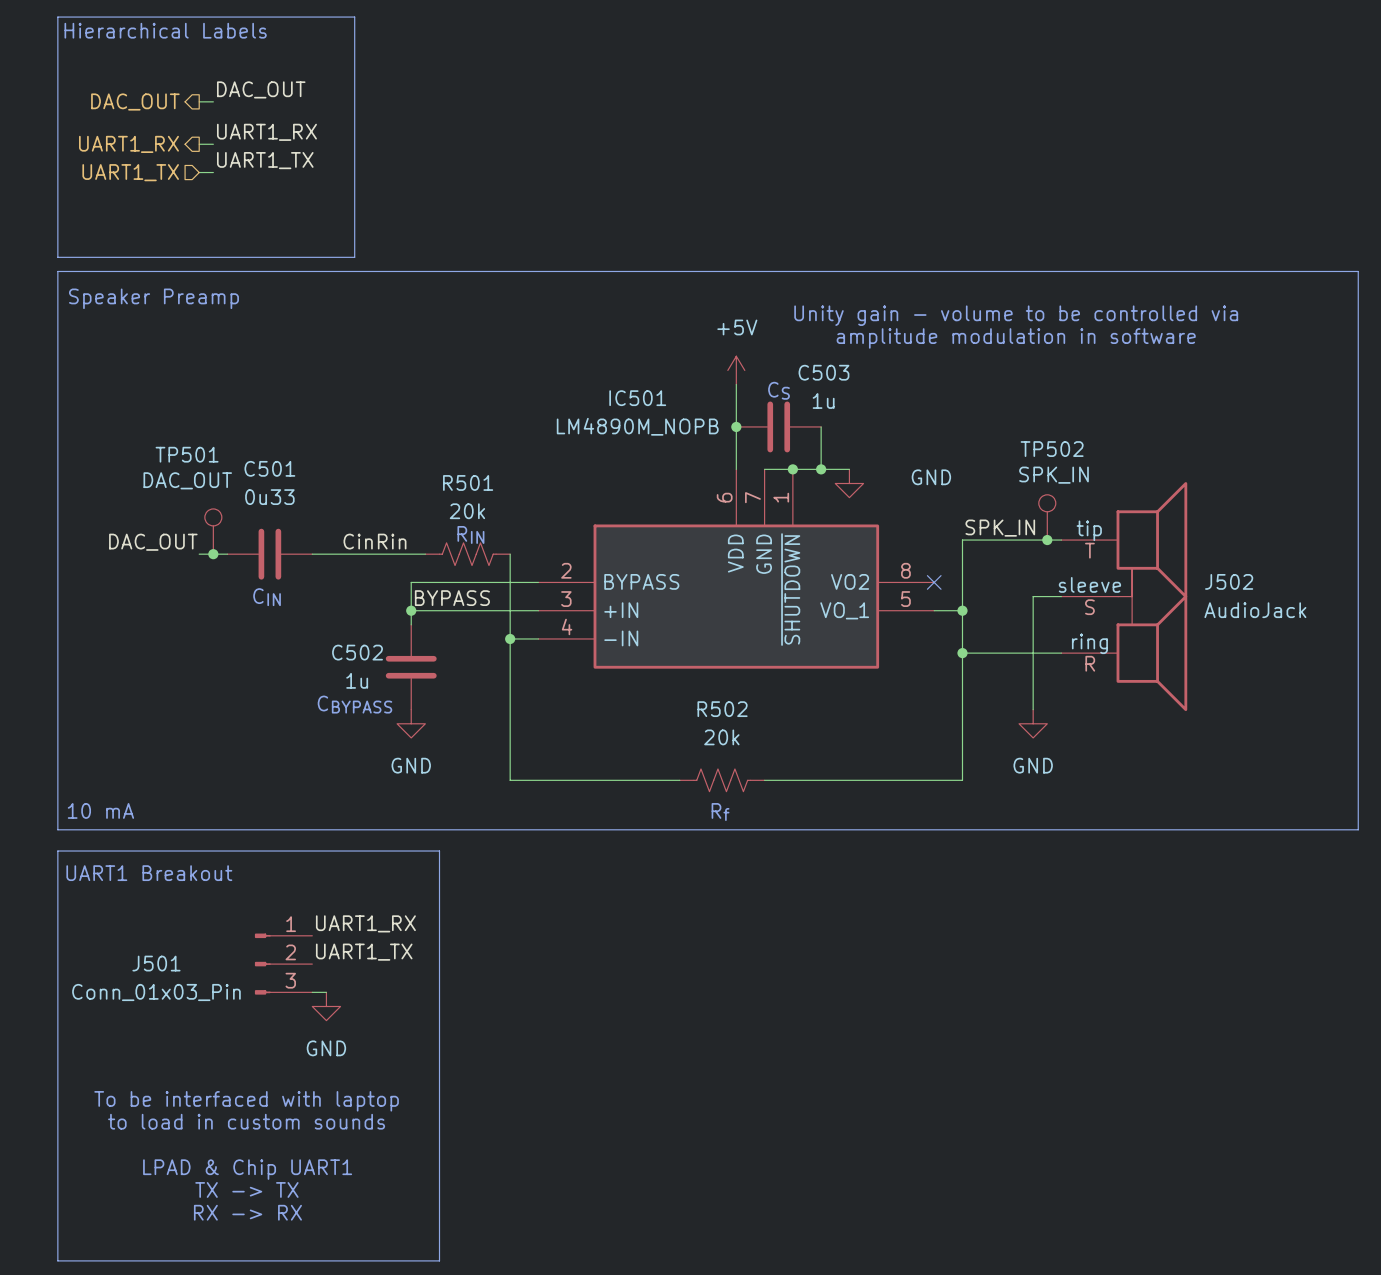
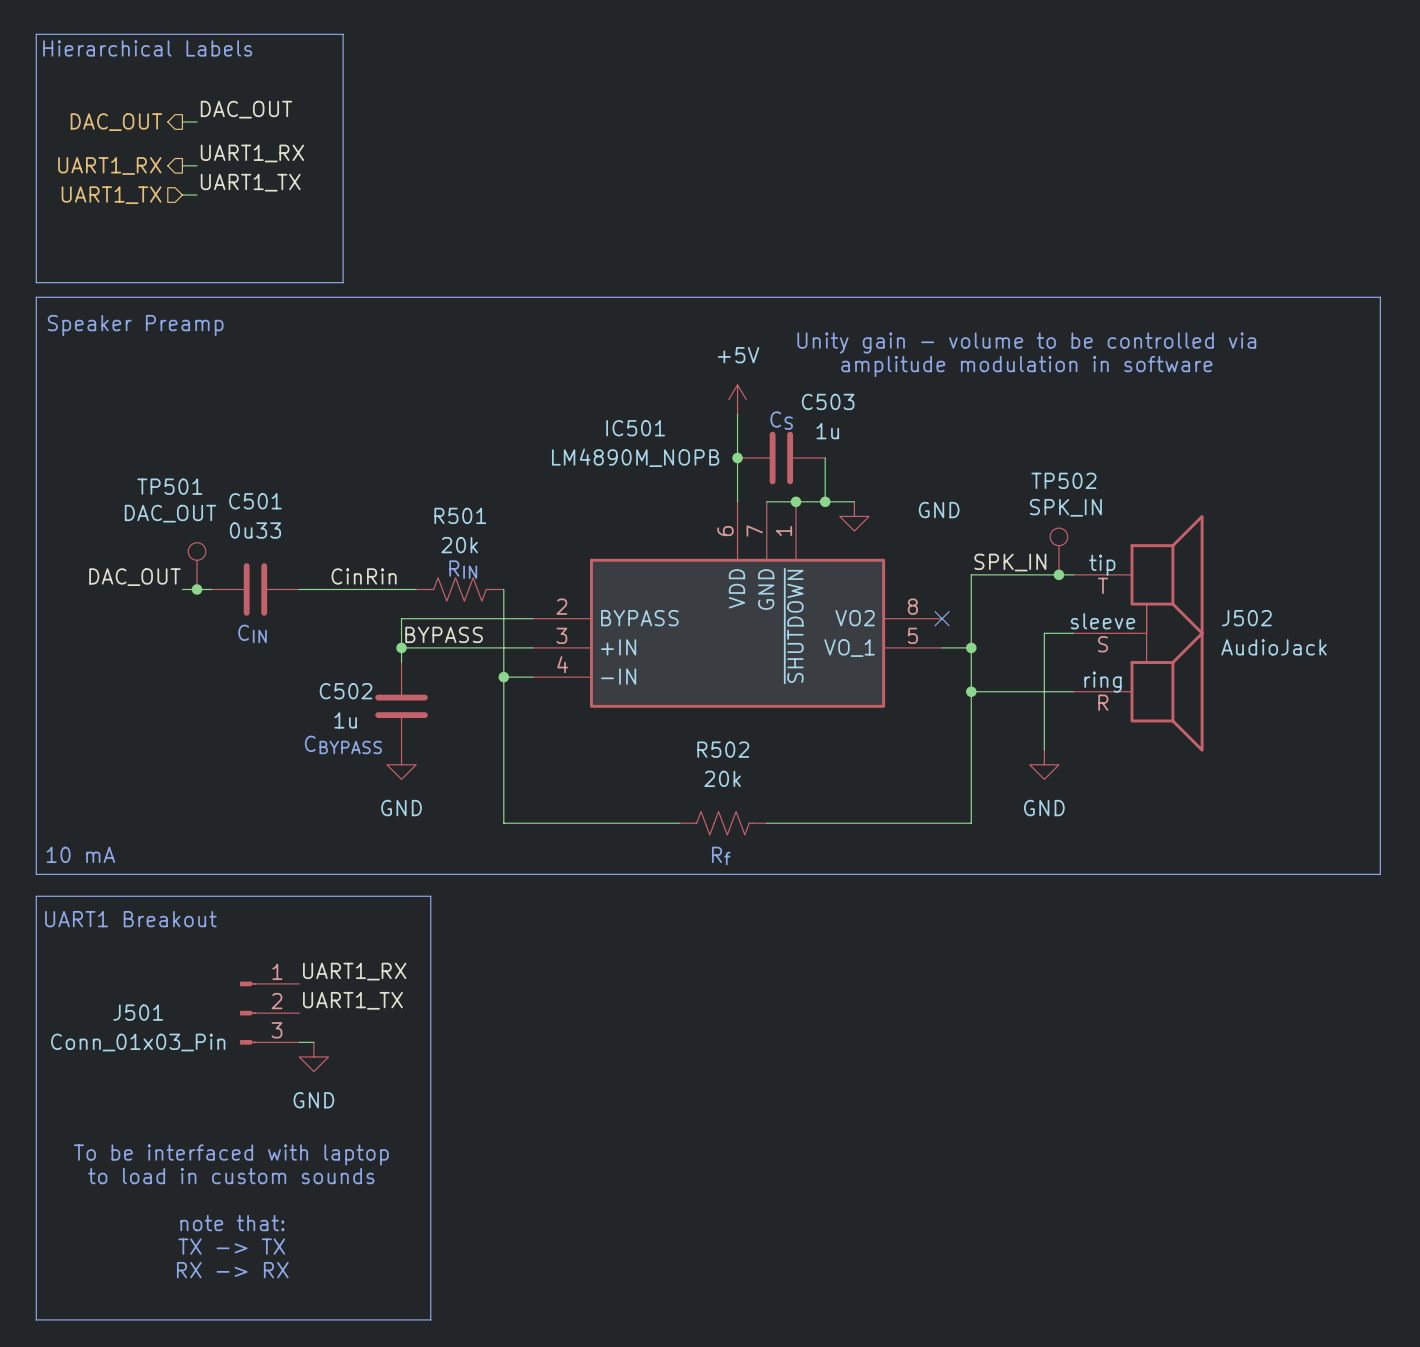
text: LPAD & Chip UART1 (247, 1169) -> note that: (232, 1223)

